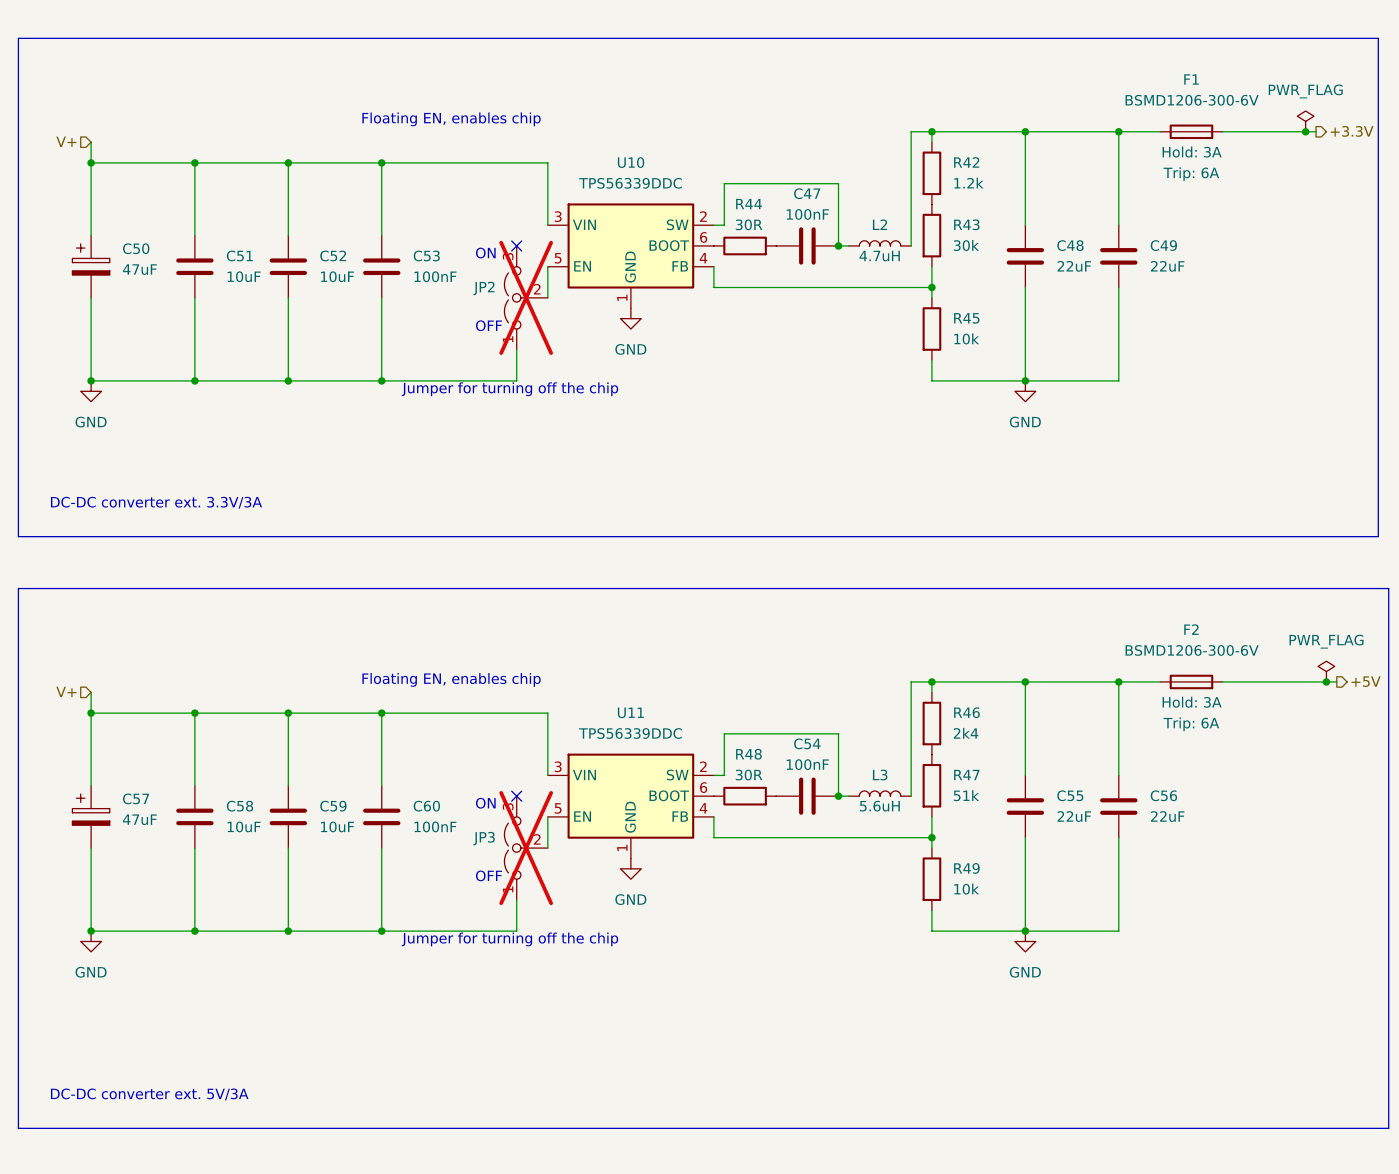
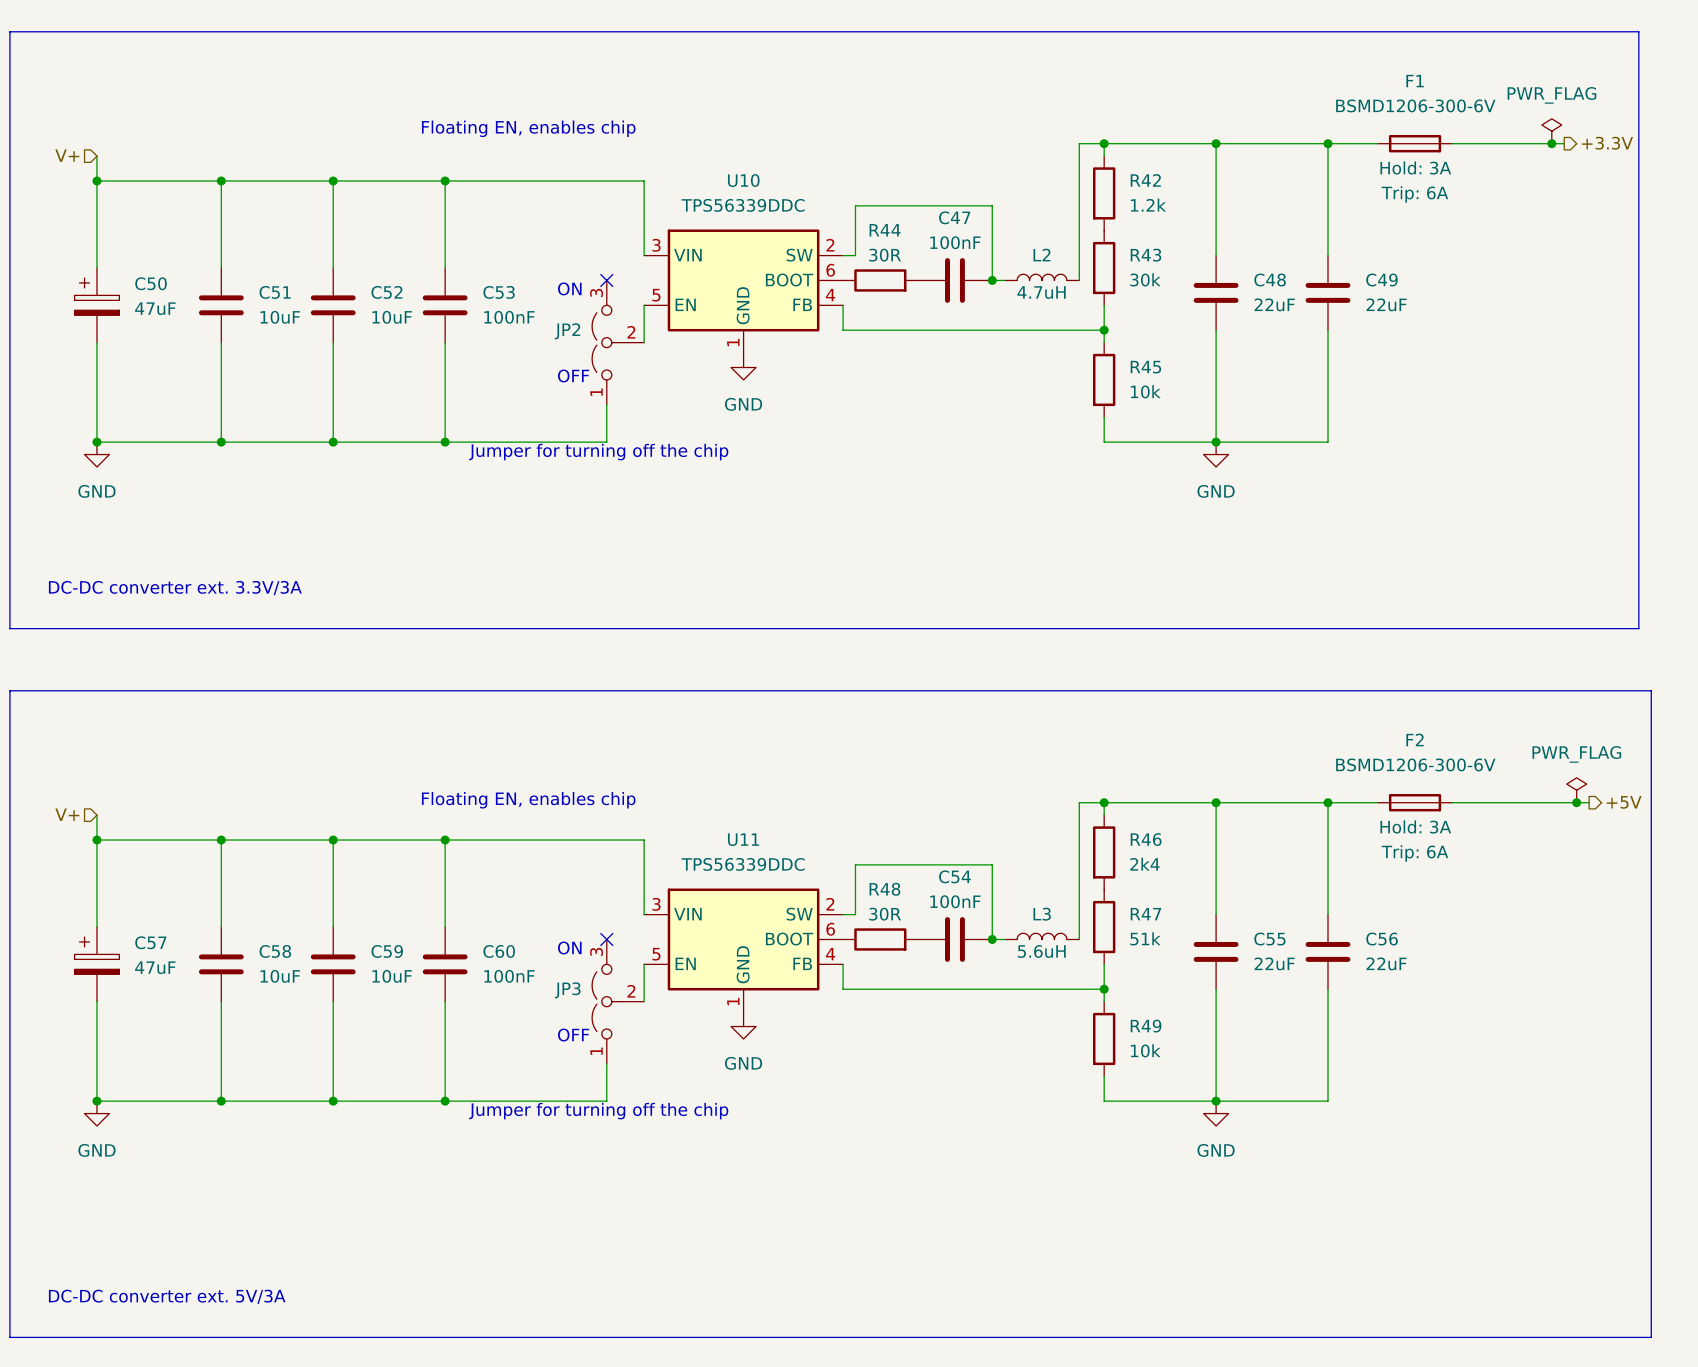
JP2 do-not-place cross: (526, 297) -> none
JP3 do-not-place cross: (526, 848) -> none

